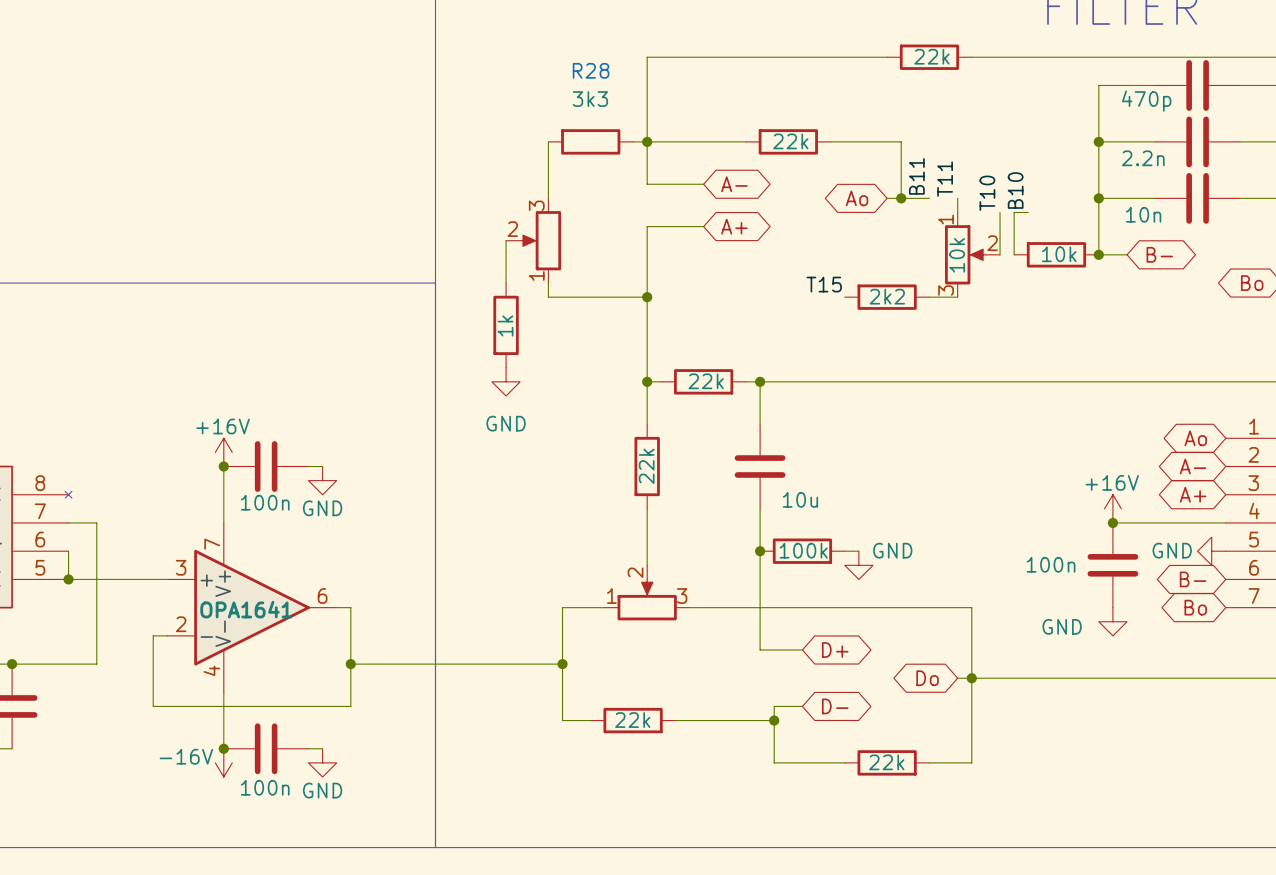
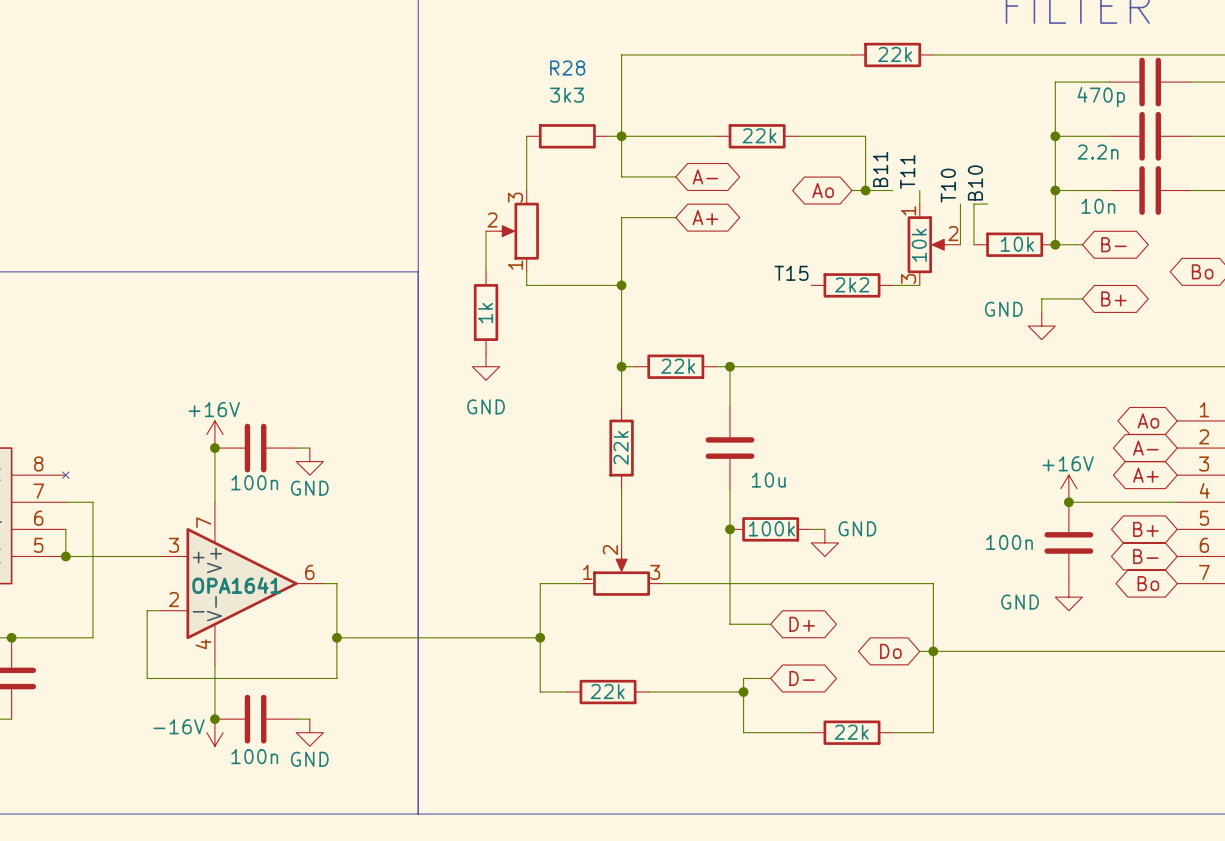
wire: none -> (1082, 298) (1041, 298) (1041, 312)
global label: none -> B+ (1113, 298)
global label: none -> B+ (1145, 529)
power symbol rotation: 0° (1211, 551) -> 90° counterclockwise (1041, 326)
power symbol position: GND (1211, 551) -> GND (1041, 326)

